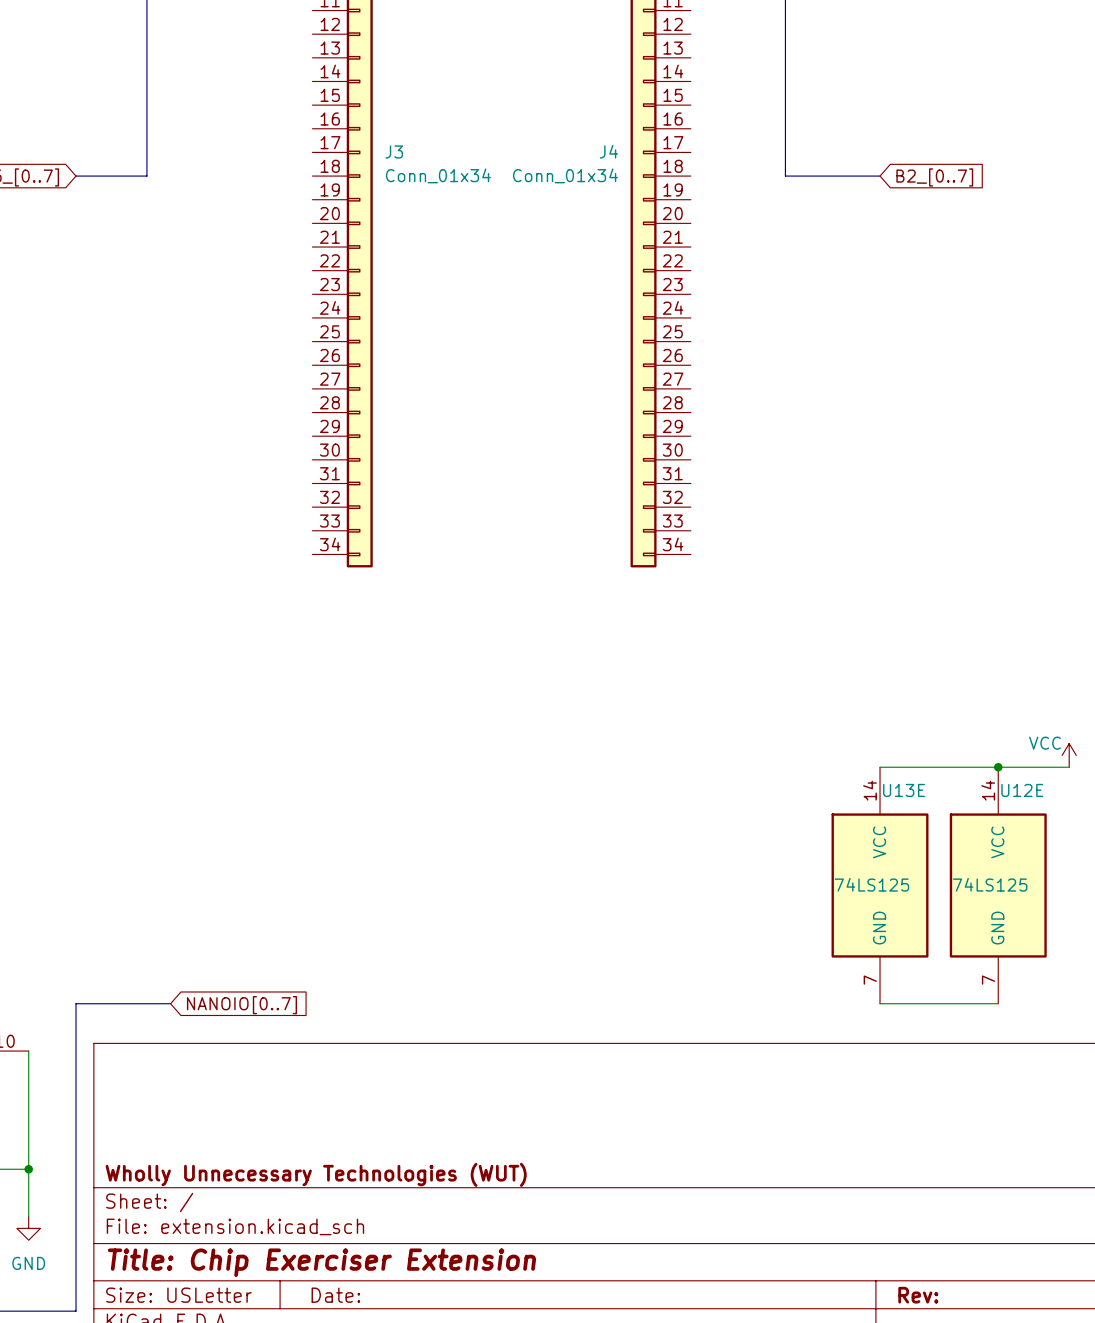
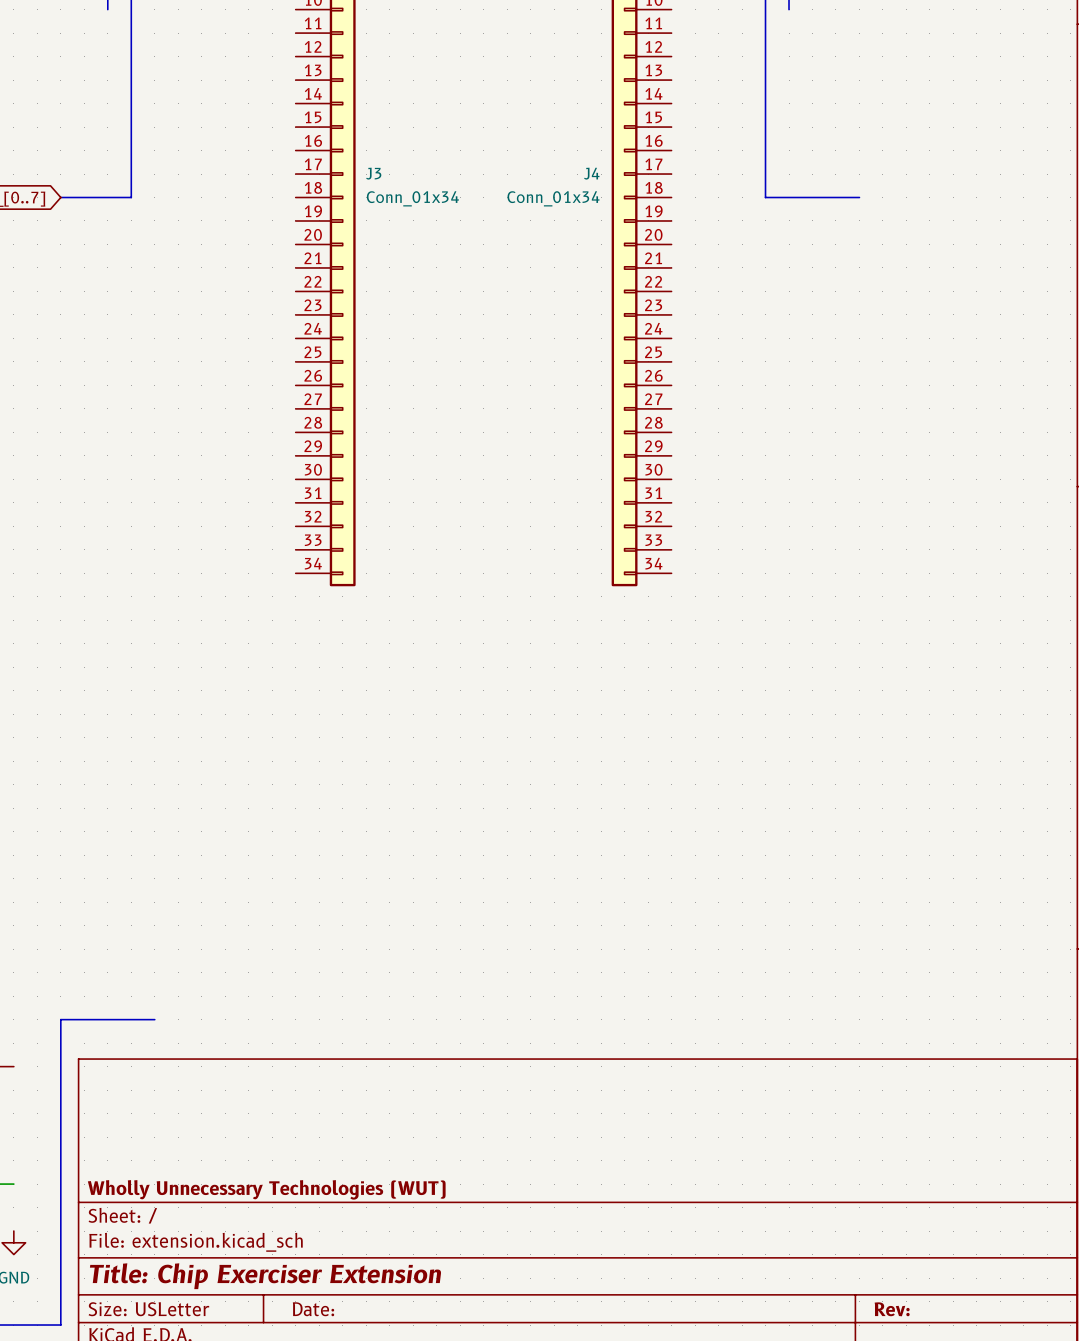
global label: B2_[0..7] (934, 177) -> none
power symbol: VCC (1069, 755) -> none
wire: (880, 767) (1069, 767) -> none
junction: (998, 767) -> none
U13E: 74LS125 (880, 885) -> none
U12E: 74LS125 (998, 885) -> none
wire: (880, 1003) (998, 1003) -> none
global label: NANOIO[0..7] (241, 1005) -> none
wire: (28, 1051) (28, 1216) -> none
junction: (28, 1169) -> none

